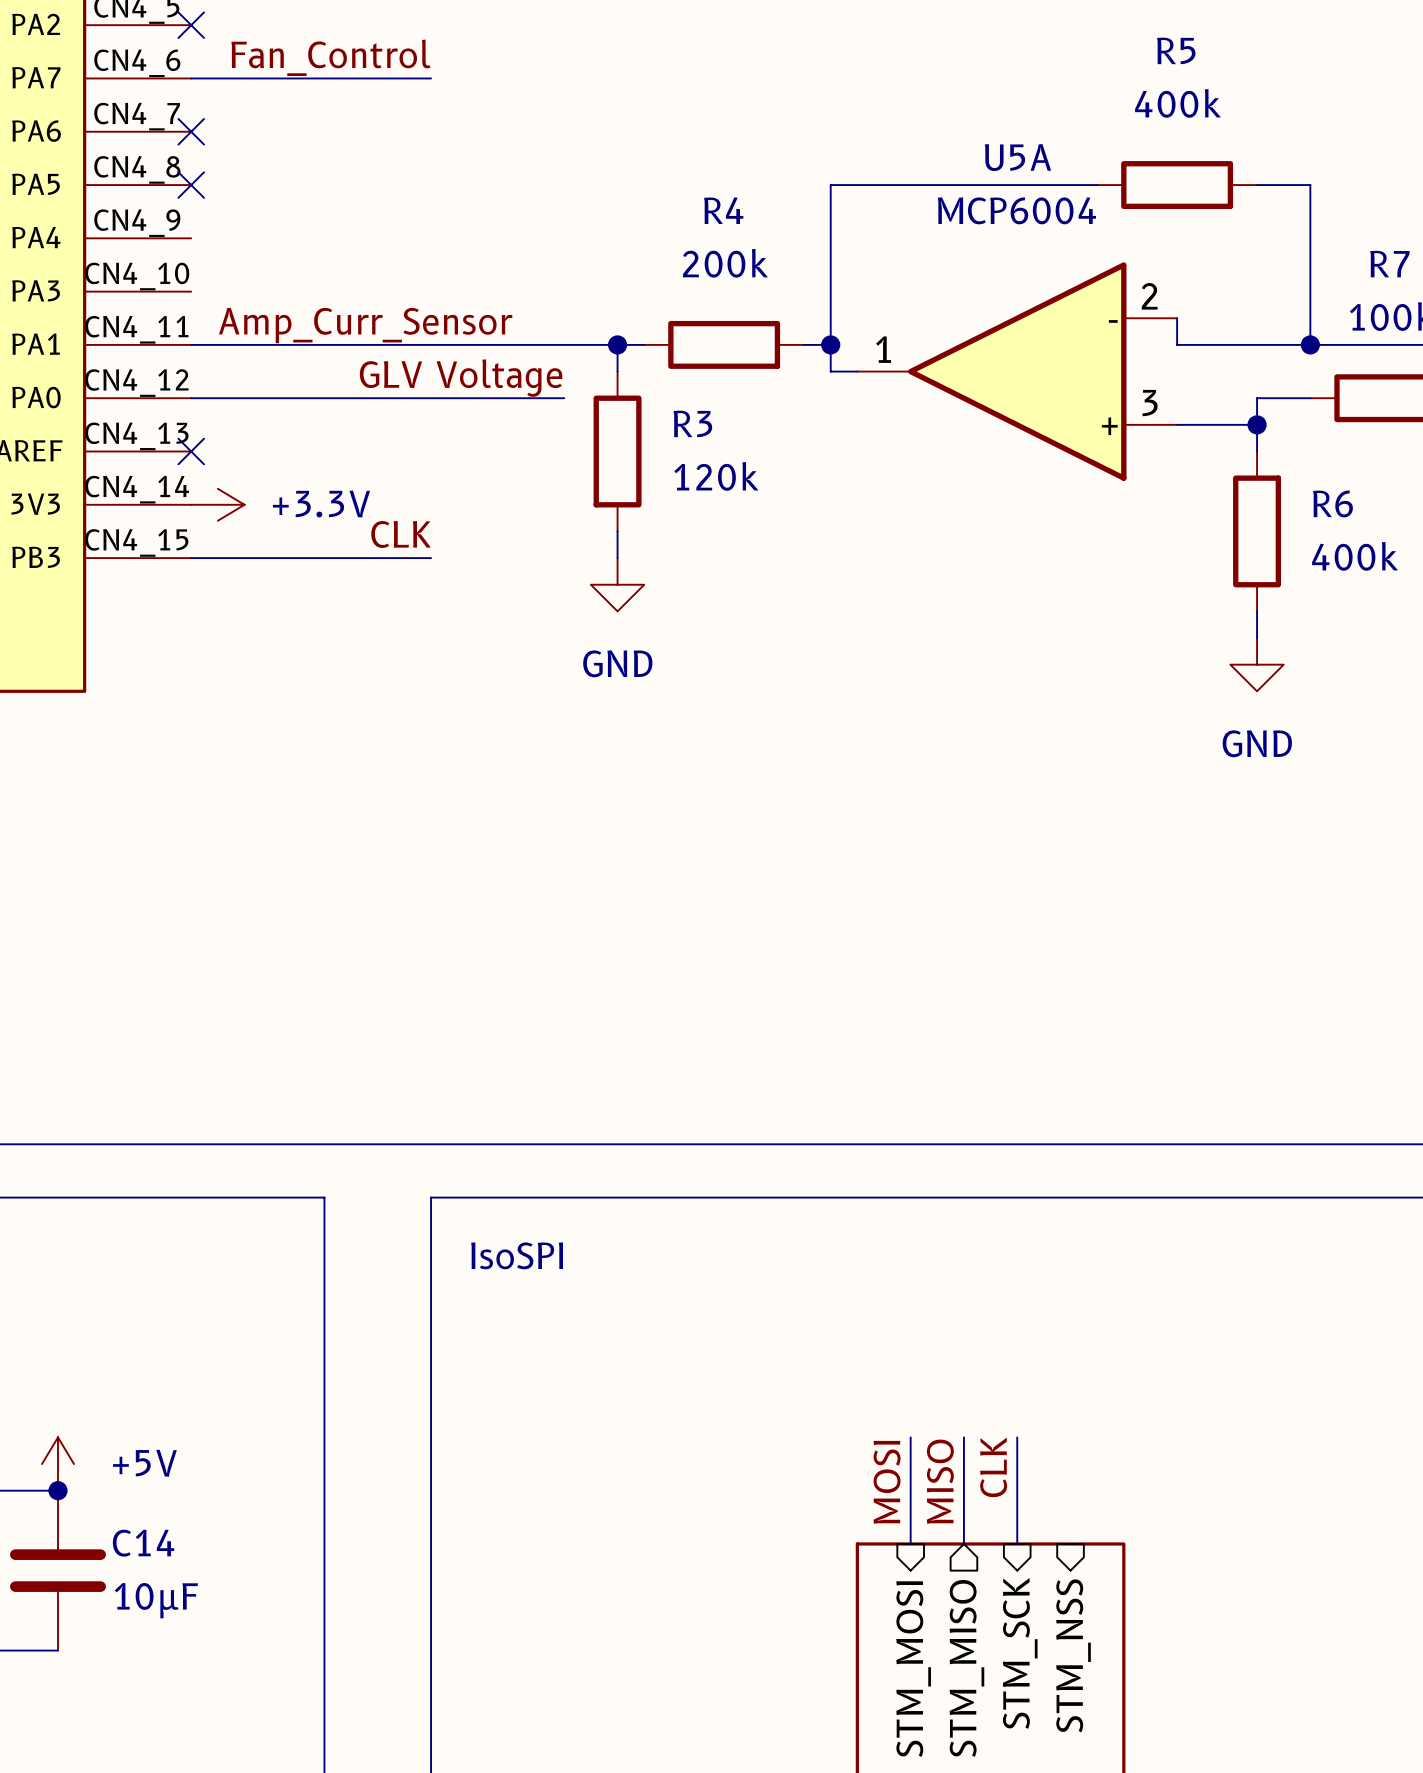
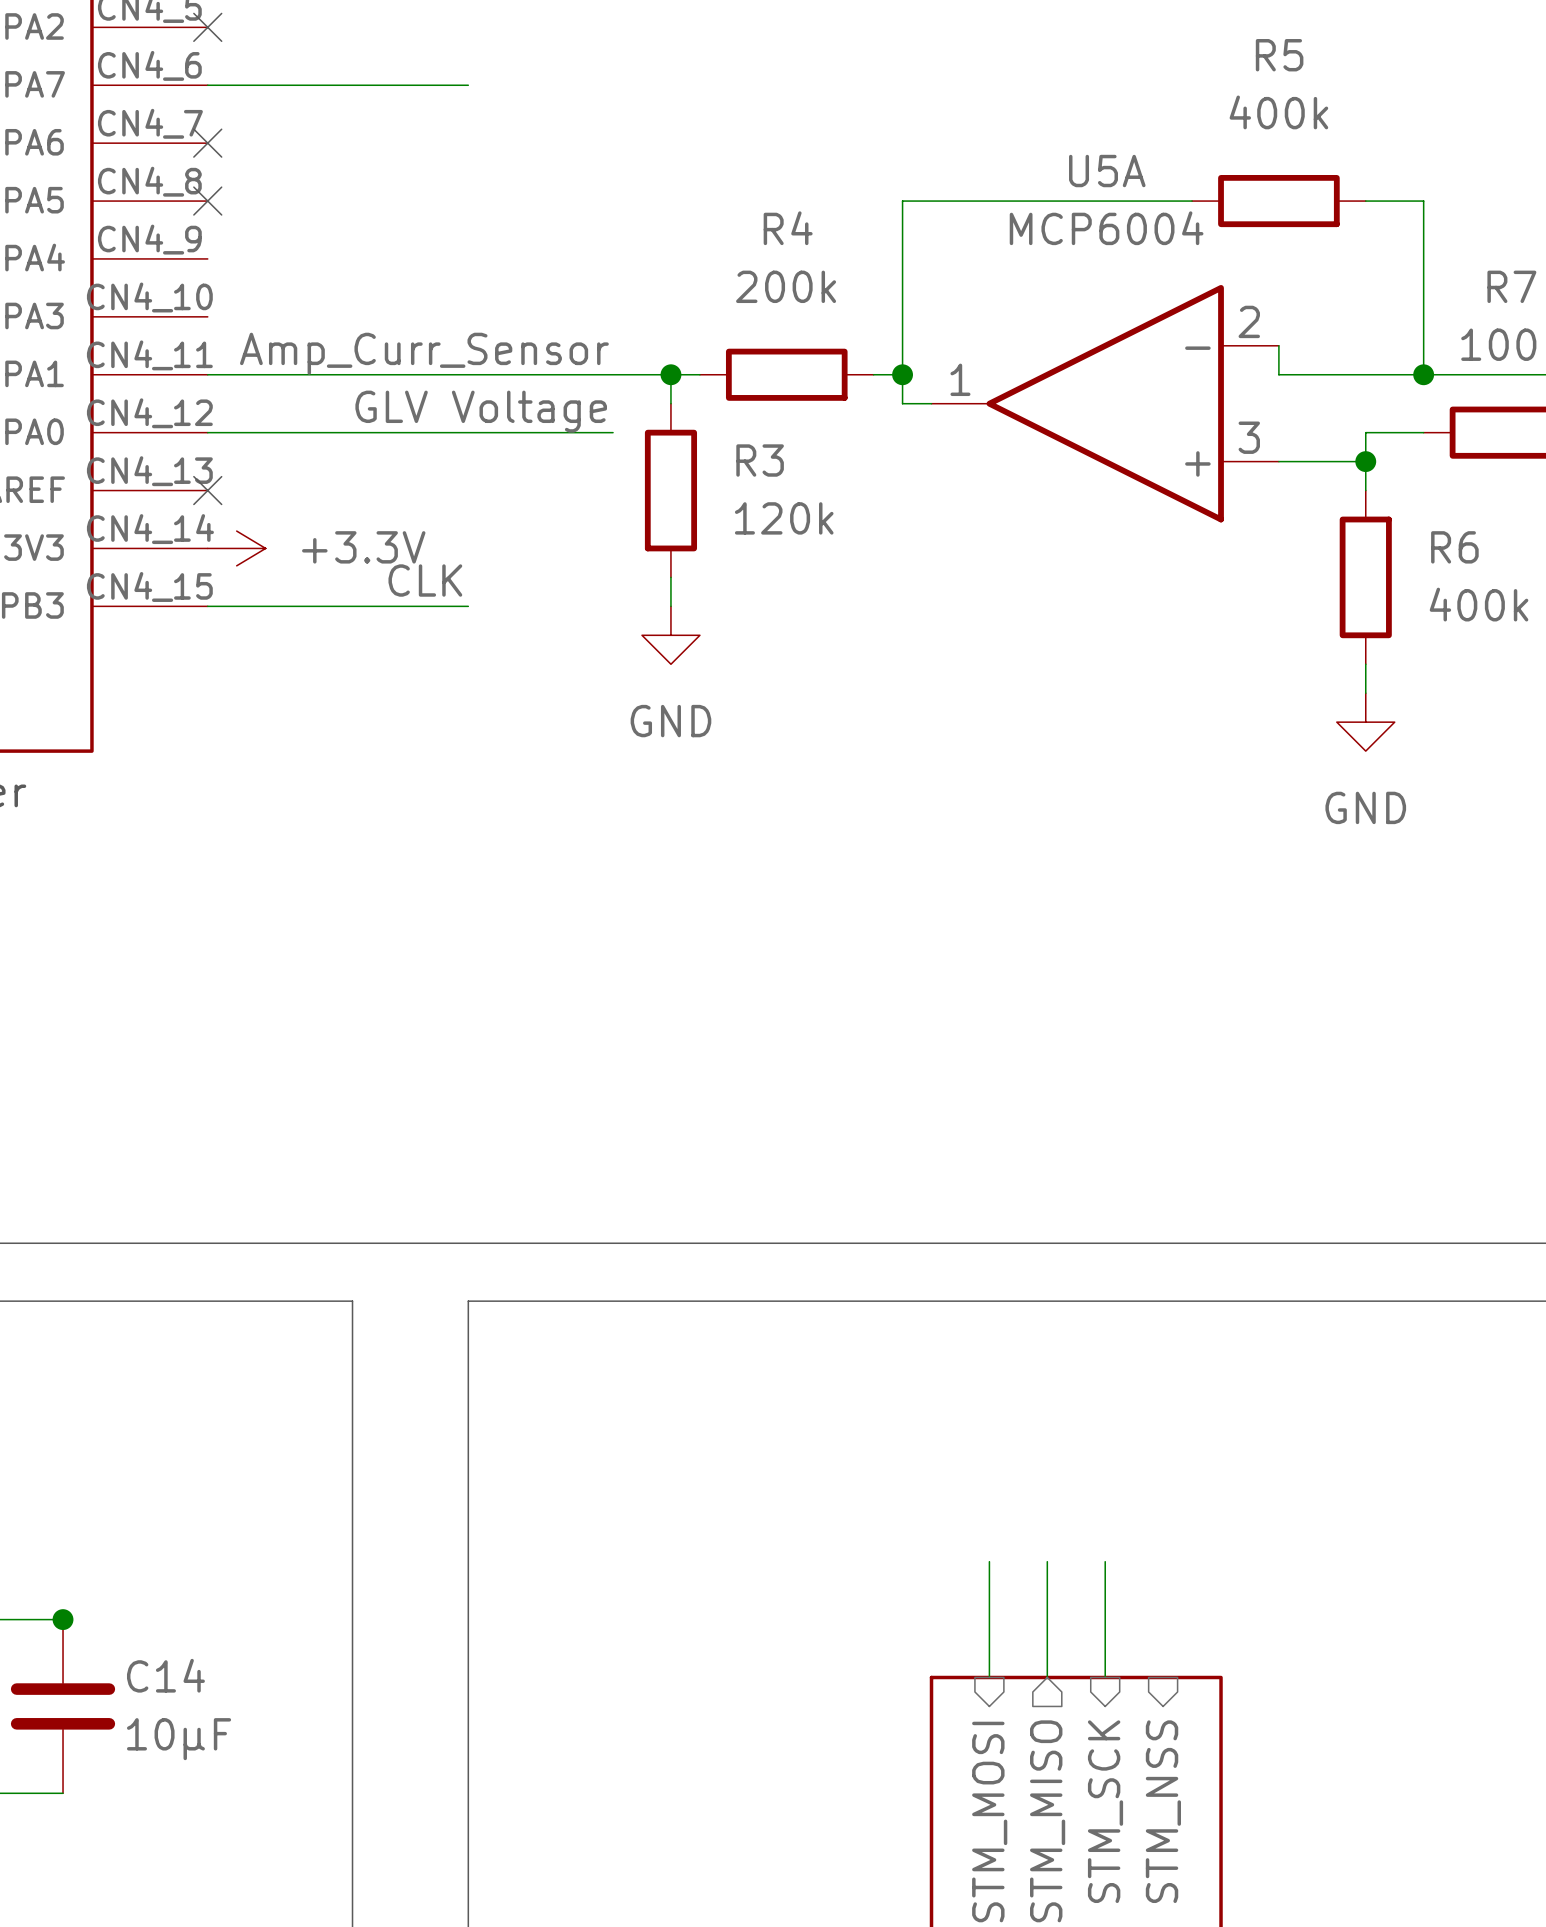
label: Fan_Control (330, 57) -> none
text: IsoSPI (517, 1255) -> none
power symbol: +5V (58, 1464) -> none
label: CLK (993, 1467) -> none
label: MISO (940, 1481) -> none
label: MOSI (887, 1482) -> none

